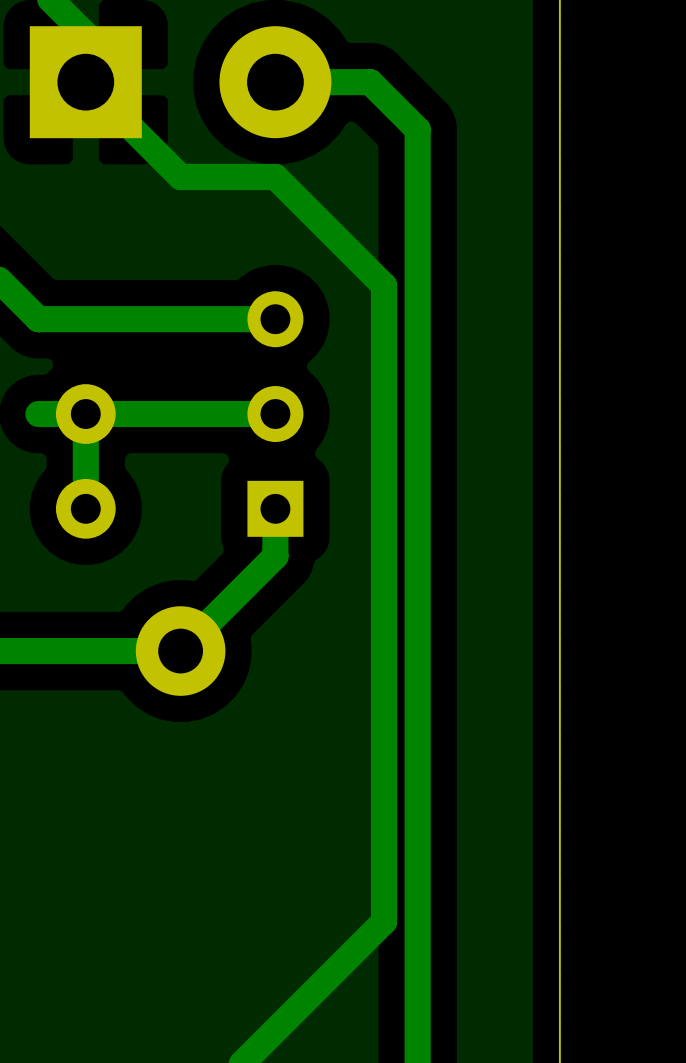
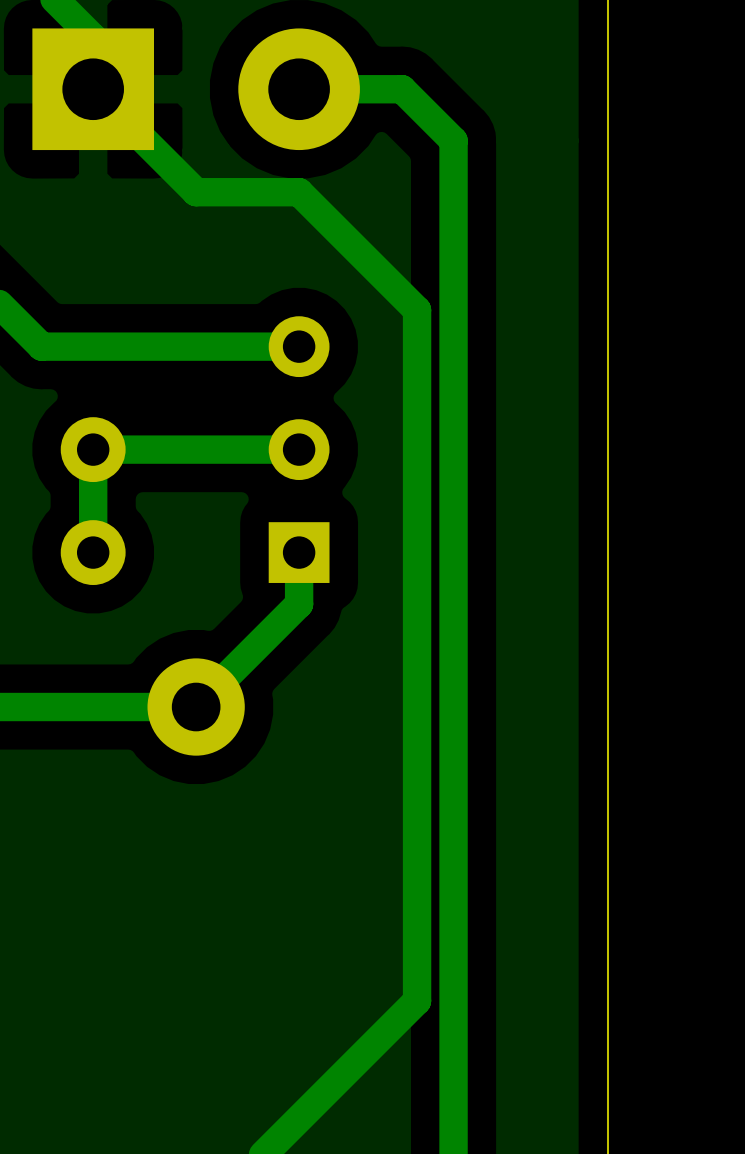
bottom track: (85, 414) (38, 414) -> none

